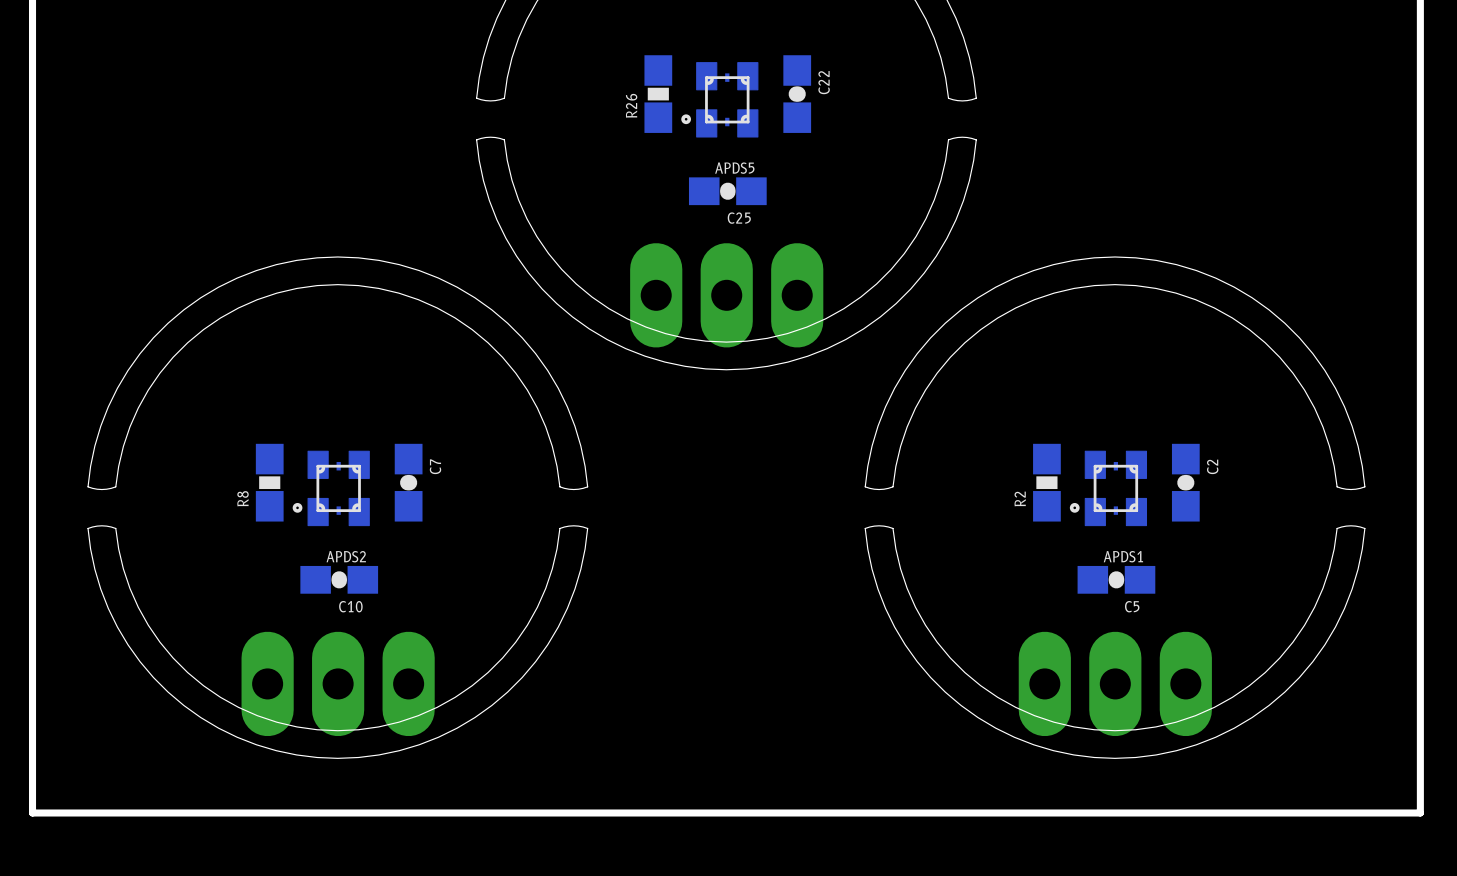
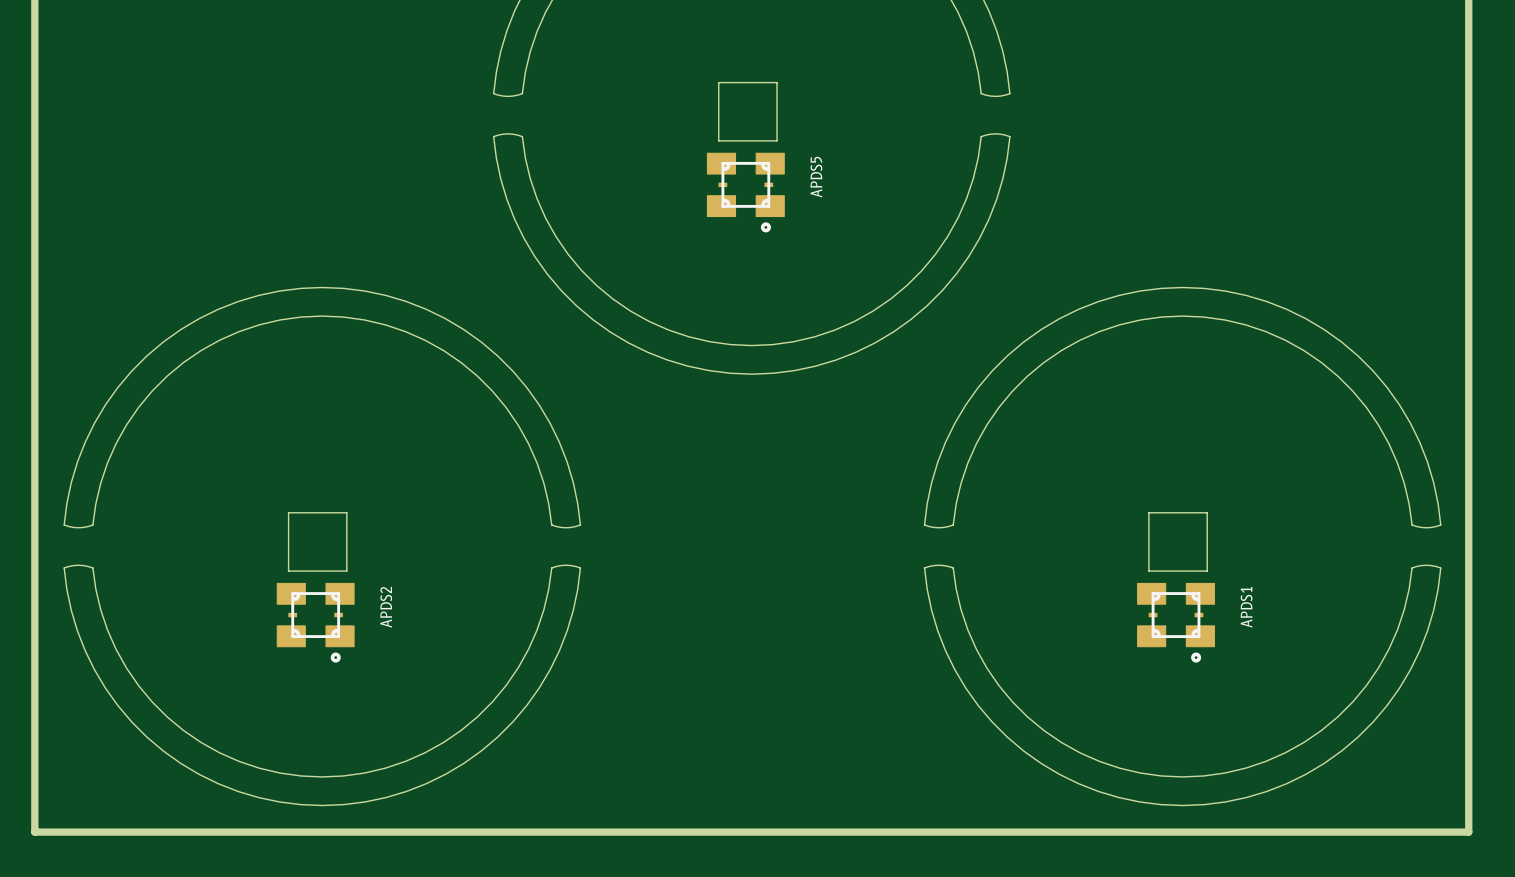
board edge: none -> (777, 82) (718, 82) (718, 140) (777, 140) (777, 82)
R26: (658, 94) -> none
C22: (797, 94) -> none
APDS5 rotation: 0° (719, 99) -> 90° counterclockwise (745, 192)
APDS5 position: (719, 99) -> (745, 192)
C25: (727, 191) -> none
part: (726, 295) -> none
R8: (269, 482) -> none
C7: (408, 482) -> none
R2: (1046, 482) -> none
C2: (1185, 482) -> none
board edge: (587, 486) (580, 446) (567, 406) (547, 370) (522, 337) (507, 323) (474, 297) (457, 287) (419, 270) (379, 260) (337, 256) (296, 260) (256, 270) (218, 287) (200, 297) (168, 323) (153, 337) (128, 370) (108, 406) (94, 446) (88, 486) (101, 489) (115, 486) (123, 446) (138, 408) (159, 373) (187, 342) (203, 329) (220, 317) (257, 299) (296, 288) (337, 284) (378, 288) (418, 299) (455, 317) (472, 329) (488, 342) (515, 373) (537, 408) (552, 446) (559, 486) (573, 489) (587, 486) -> (580, 525) (573, 482) (559, 442) (539, 404) (512, 371) (497, 355) (463, 329) (445, 318) (406, 301) (364, 291) (322, 287) (279, 291) (238, 301) (199, 318) (180, 329) (146, 355) (131, 371) (105, 404) (85, 442) (71, 482) (64, 525) (78, 527) (92, 525) (100, 483) (116, 443) (138, 407) (167, 376) (183, 362) (201, 350) (239, 331) (279, 319) (322, 316) (364, 319) (405, 331) (443, 350) (461, 362) (477, 376) (506, 407) (528, 443) (543, 483) (551, 525) (566, 527) (580, 525)
board edge: (1364, 486) (1358, 446) (1344, 406) (1324, 370) (1299, 337) (1284, 323) (1252, 297) (1234, 287) (1196, 270) (1156, 260) (1115, 256) (1073, 260) (1033, 270) (995, 287) (977, 297) (945, 323) (930, 337) (905, 370) (885, 406) (872, 446) (865, 486) (879, 489) (892, 486) (900, 446) (915, 408) (937, 373) (964, 342) (980, 329) (997, 317) (1034, 299) (1074, 288) (1115, 284) (1156, 288) (1195, 299) (1232, 317) (1249, 329) (1265, 342) (1292, 373) (1314, 408) (1329, 446) (1337, 486) (1350, 489) (1364, 486) -> (1440, 525) (1433, 482) (1419, 442) (1399, 404) (1373, 371) (1358, 355) (1324, 329) (1305, 318) (1266, 301) (1225, 291) (1182, 287) (1140, 291) (1098, 301) (1059, 318) (1041, 329) (1007, 355) (992, 371) (965, 404) (945, 442) (931, 482) (924, 525) (938, 527) (953, 525) (961, 483) (976, 443) (998, 407) (1027, 376) (1043, 362) (1061, 350) (1099, 331) (1140, 319) (1182, 316) (1224, 319) (1265, 331) (1303, 350) (1321, 362) (1337, 376) (1366, 407) (1388, 443) (1404, 483) (1412, 525) (1426, 527) (1440, 525)
APDS2 rotation: 0° (331, 488) -> 90° counterclockwise (315, 622)
APDS2 position: (331, 488) -> (315, 622)
APDS1 rotation: 0° (1108, 488) -> 90° counterclockwise (1176, 622)
APDS1 position: (1108, 488) -> (1176, 622)
board edge: none -> (346, 512) (288, 512) (288, 571) (346, 571) (346, 512)
board edge: none -> (1207, 512) (1207, 571) (1148, 571) (1148, 512) (1207, 512)
board edge: (587, 528) (580, 569) (567, 608) (547, 644) (522, 677) (507, 692) (474, 717) (457, 728) (419, 744) (379, 754) (337, 758) (296, 754) (256, 744) (218, 728) (200, 717) (168, 692) (153, 677) (128, 644) (108, 608) (94, 569) (88, 528) (101, 525) (115, 528) (123, 568) (138, 607) (159, 642) (187, 672) (203, 685) (220, 697) (257, 715) (296, 726) (337, 730) (378, 726) (418, 715) (455, 697) (472, 685) (488, 672) (515, 642) (537, 607) (552, 568) (559, 528) (573, 525) (587, 528) -> (580, 568) (573, 610) (559, 650) (539, 688) (512, 721) (497, 737) (463, 763) (445, 774) (406, 791) (364, 801) (322, 805) (279, 801) (238, 791) (199, 774) (180, 763) (146, 737) (131, 721) (105, 688) (85, 650) (71, 610) (64, 568) (78, 565) (92, 568) (100, 609) (116, 649) (138, 685) (167, 716) (183, 730) (201, 742) (239, 761) (279, 773) (322, 776) (364, 773) (405, 761) (443, 742) (461, 730) (477, 716) (506, 685) (528, 649) (543, 609) (551, 568) (566, 565) (580, 568)
board edge: (1364, 528) (1358, 569) (1344, 608) (1324, 644) (1299, 677) (1284, 692) (1252, 717) (1234, 728) (1196, 744) (1156, 754) (1115, 758) (1073, 754) (1033, 744) (995, 728) (977, 717) (945, 692) (930, 677) (905, 644) (885, 608) (872, 569) (865, 528) (879, 525) (892, 528) (900, 568) (915, 607) (937, 642) (964, 672) (980, 685) (997, 697) (1034, 715) (1074, 726) (1115, 730) (1156, 726) (1195, 715) (1232, 697) (1249, 685) (1265, 672) (1292, 642) (1314, 607) (1329, 568) (1337, 528) (1350, 525) (1364, 528) -> (1440, 568) (1433, 610) (1419, 650) (1399, 688) (1373, 721) (1358, 737) (1324, 763) (1305, 774) (1266, 791) (1225, 801) (1182, 805) (1140, 801) (1098, 791) (1059, 774) (1041, 763) (1007, 737) (992, 721) (965, 688) (945, 650) (931, 610) (924, 568) (938, 565) (953, 568) (961, 609) (976, 649) (998, 685) (1027, 716) (1043, 730) (1061, 742) (1099, 761) (1140, 773) (1182, 776) (1224, 773) (1265, 761) (1303, 742) (1321, 730) (1337, 716) (1366, 685) (1388, 649) (1404, 609) (1412, 568) (1426, 565) (1440, 568)
C10: (339, 579) -> none
C5: (1116, 579) -> none
part: (338, 683) -> none
part: (1115, 683) -> none

